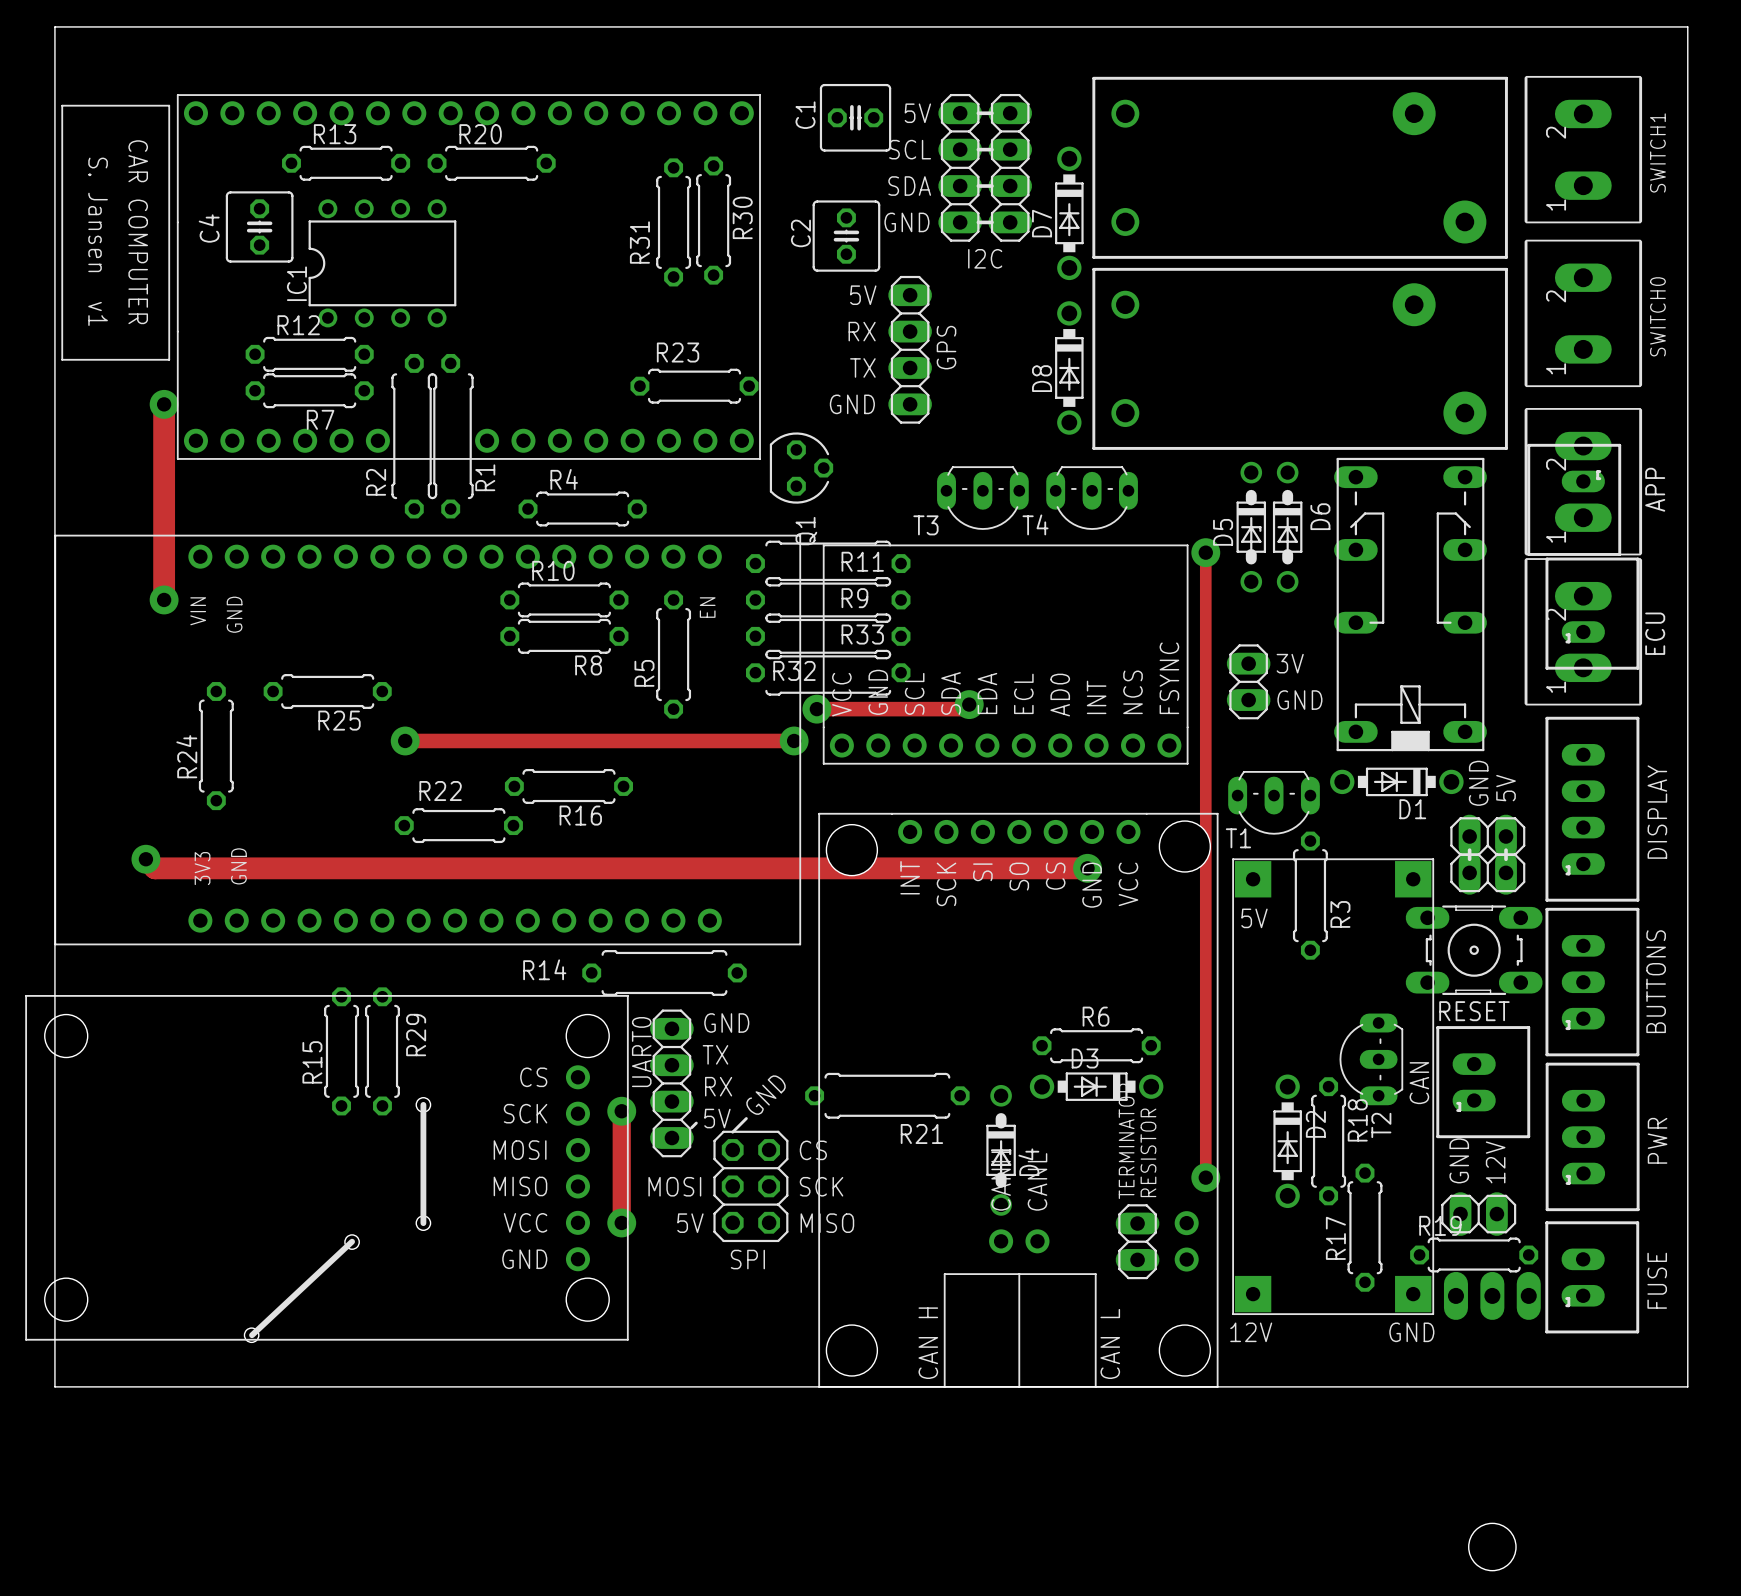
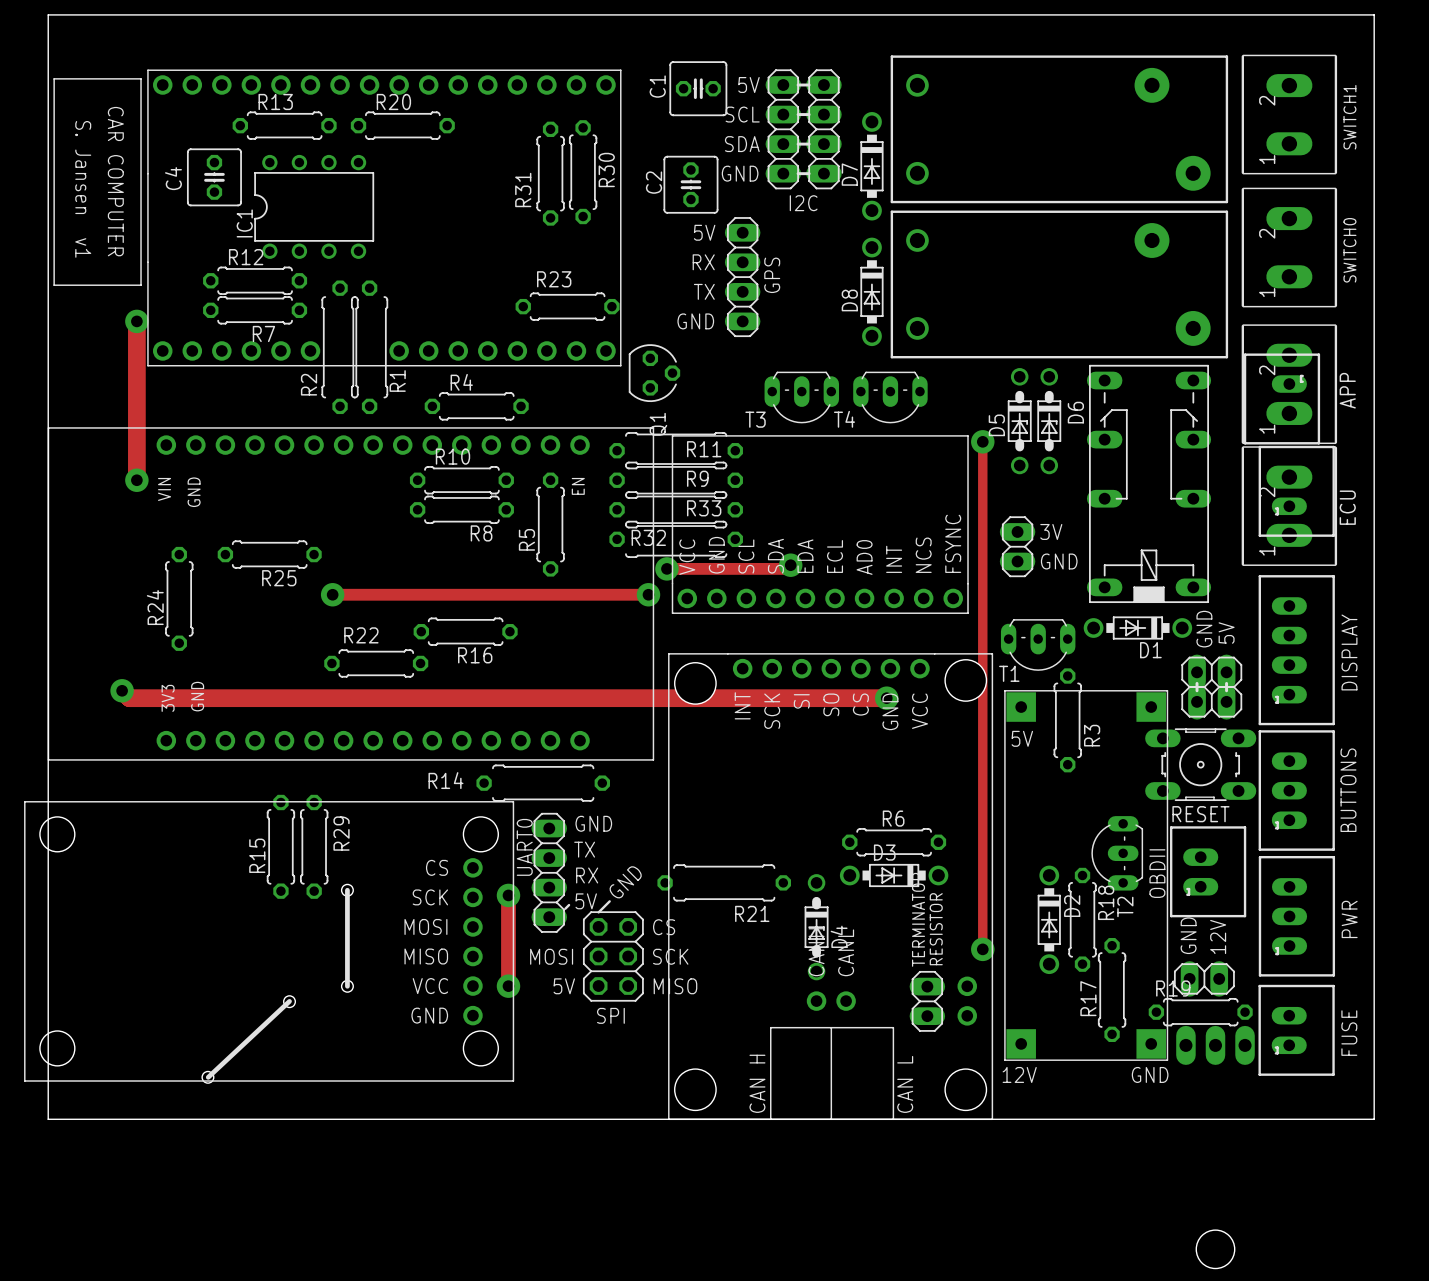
CAN name: CAN (1419, 1083) -> OBDII (1157, 873)

